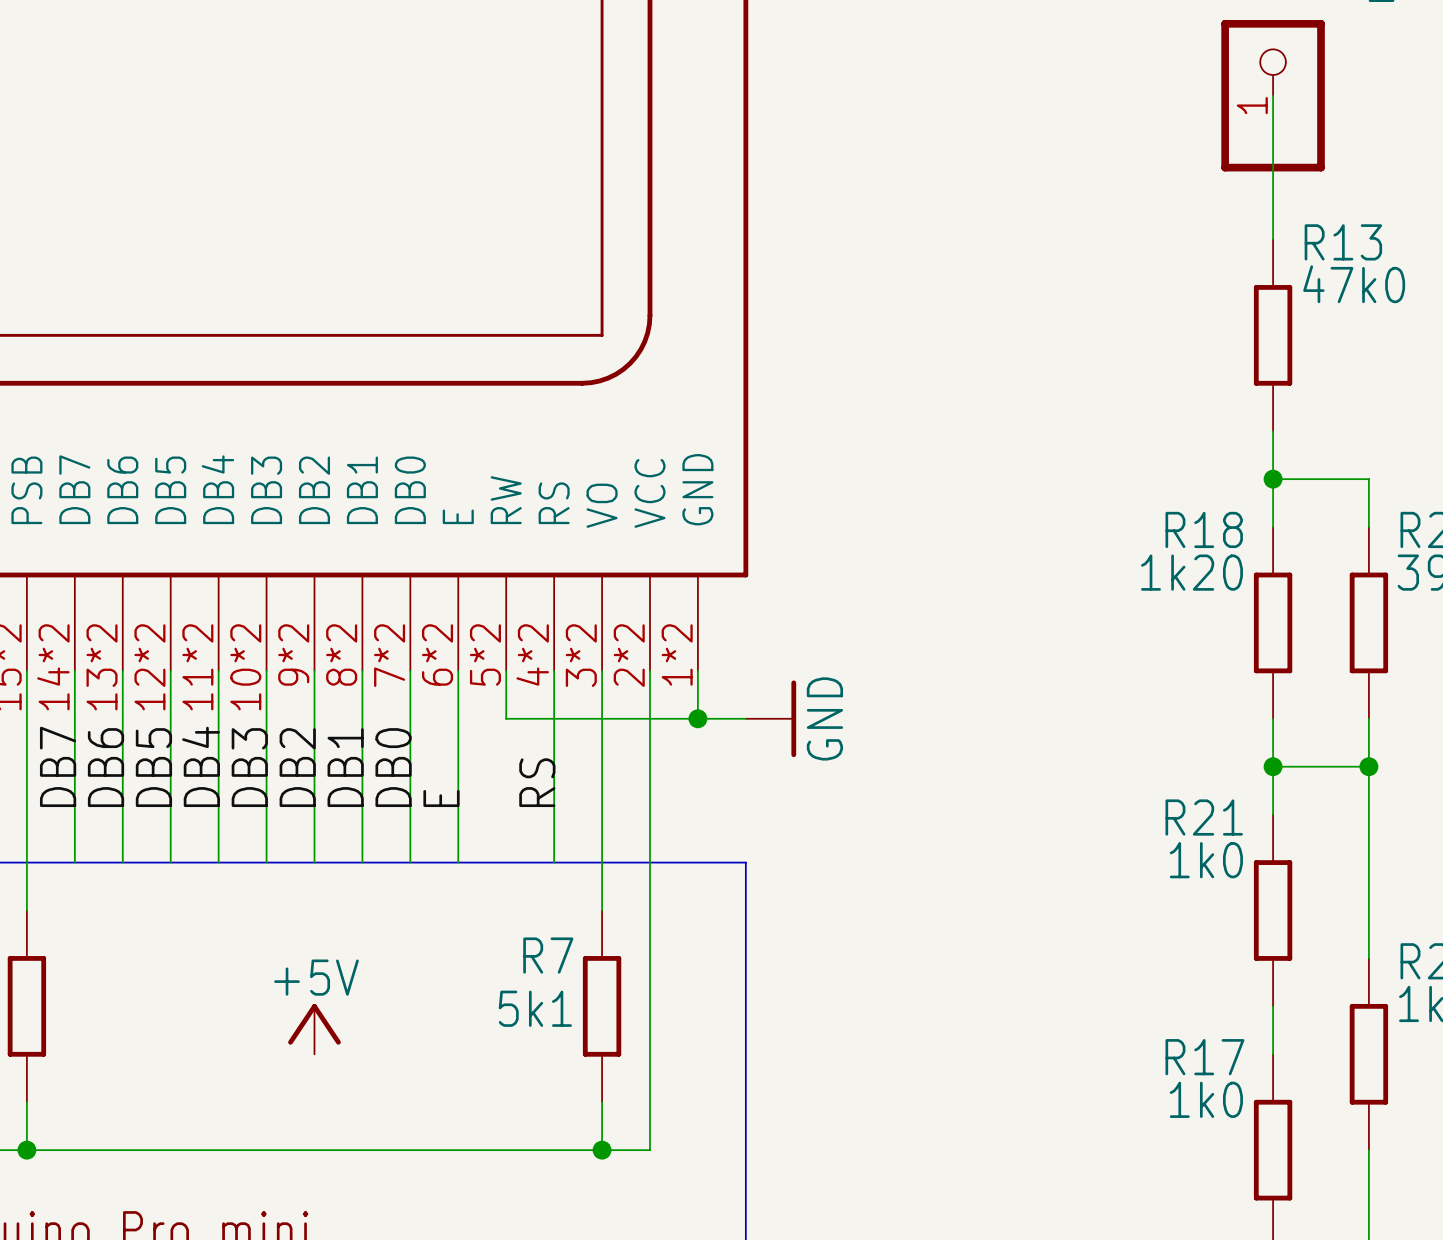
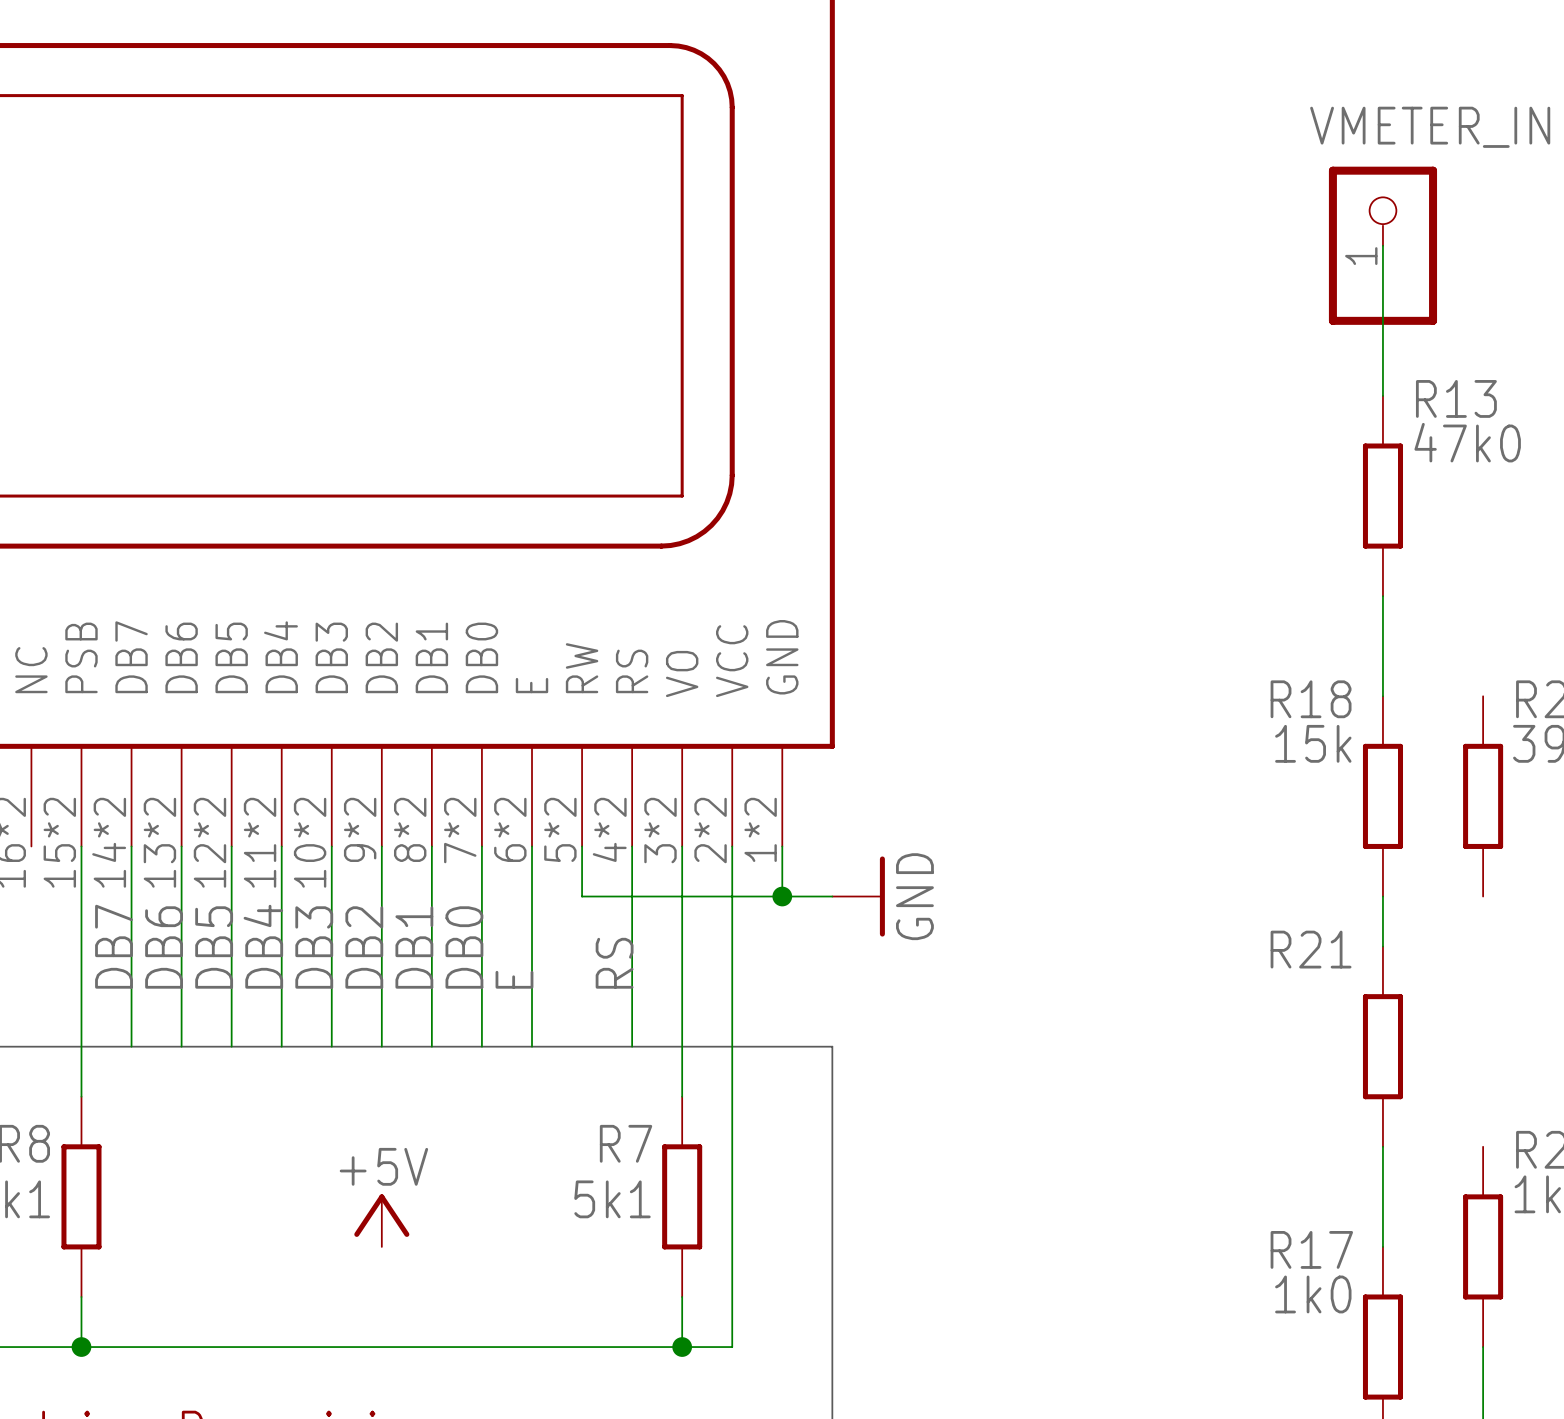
wire: (1273, 479) (1368, 479) (1368, 527) -> none
junction: (1273, 479) -> none
R18 value: 1k20 (1191, 572) -> 15k (1313, 743)
wire: (1368, 718) (1368, 958) -> none
junction: (1273, 766) -> none
wire: (1368, 766) (1273, 766) (1273, 814) -> none
junction: (1368, 766) -> none
R21 value: 1k0 (1206, 860) -> none
R21 position: (1273, 910) -> (1382, 1046)

